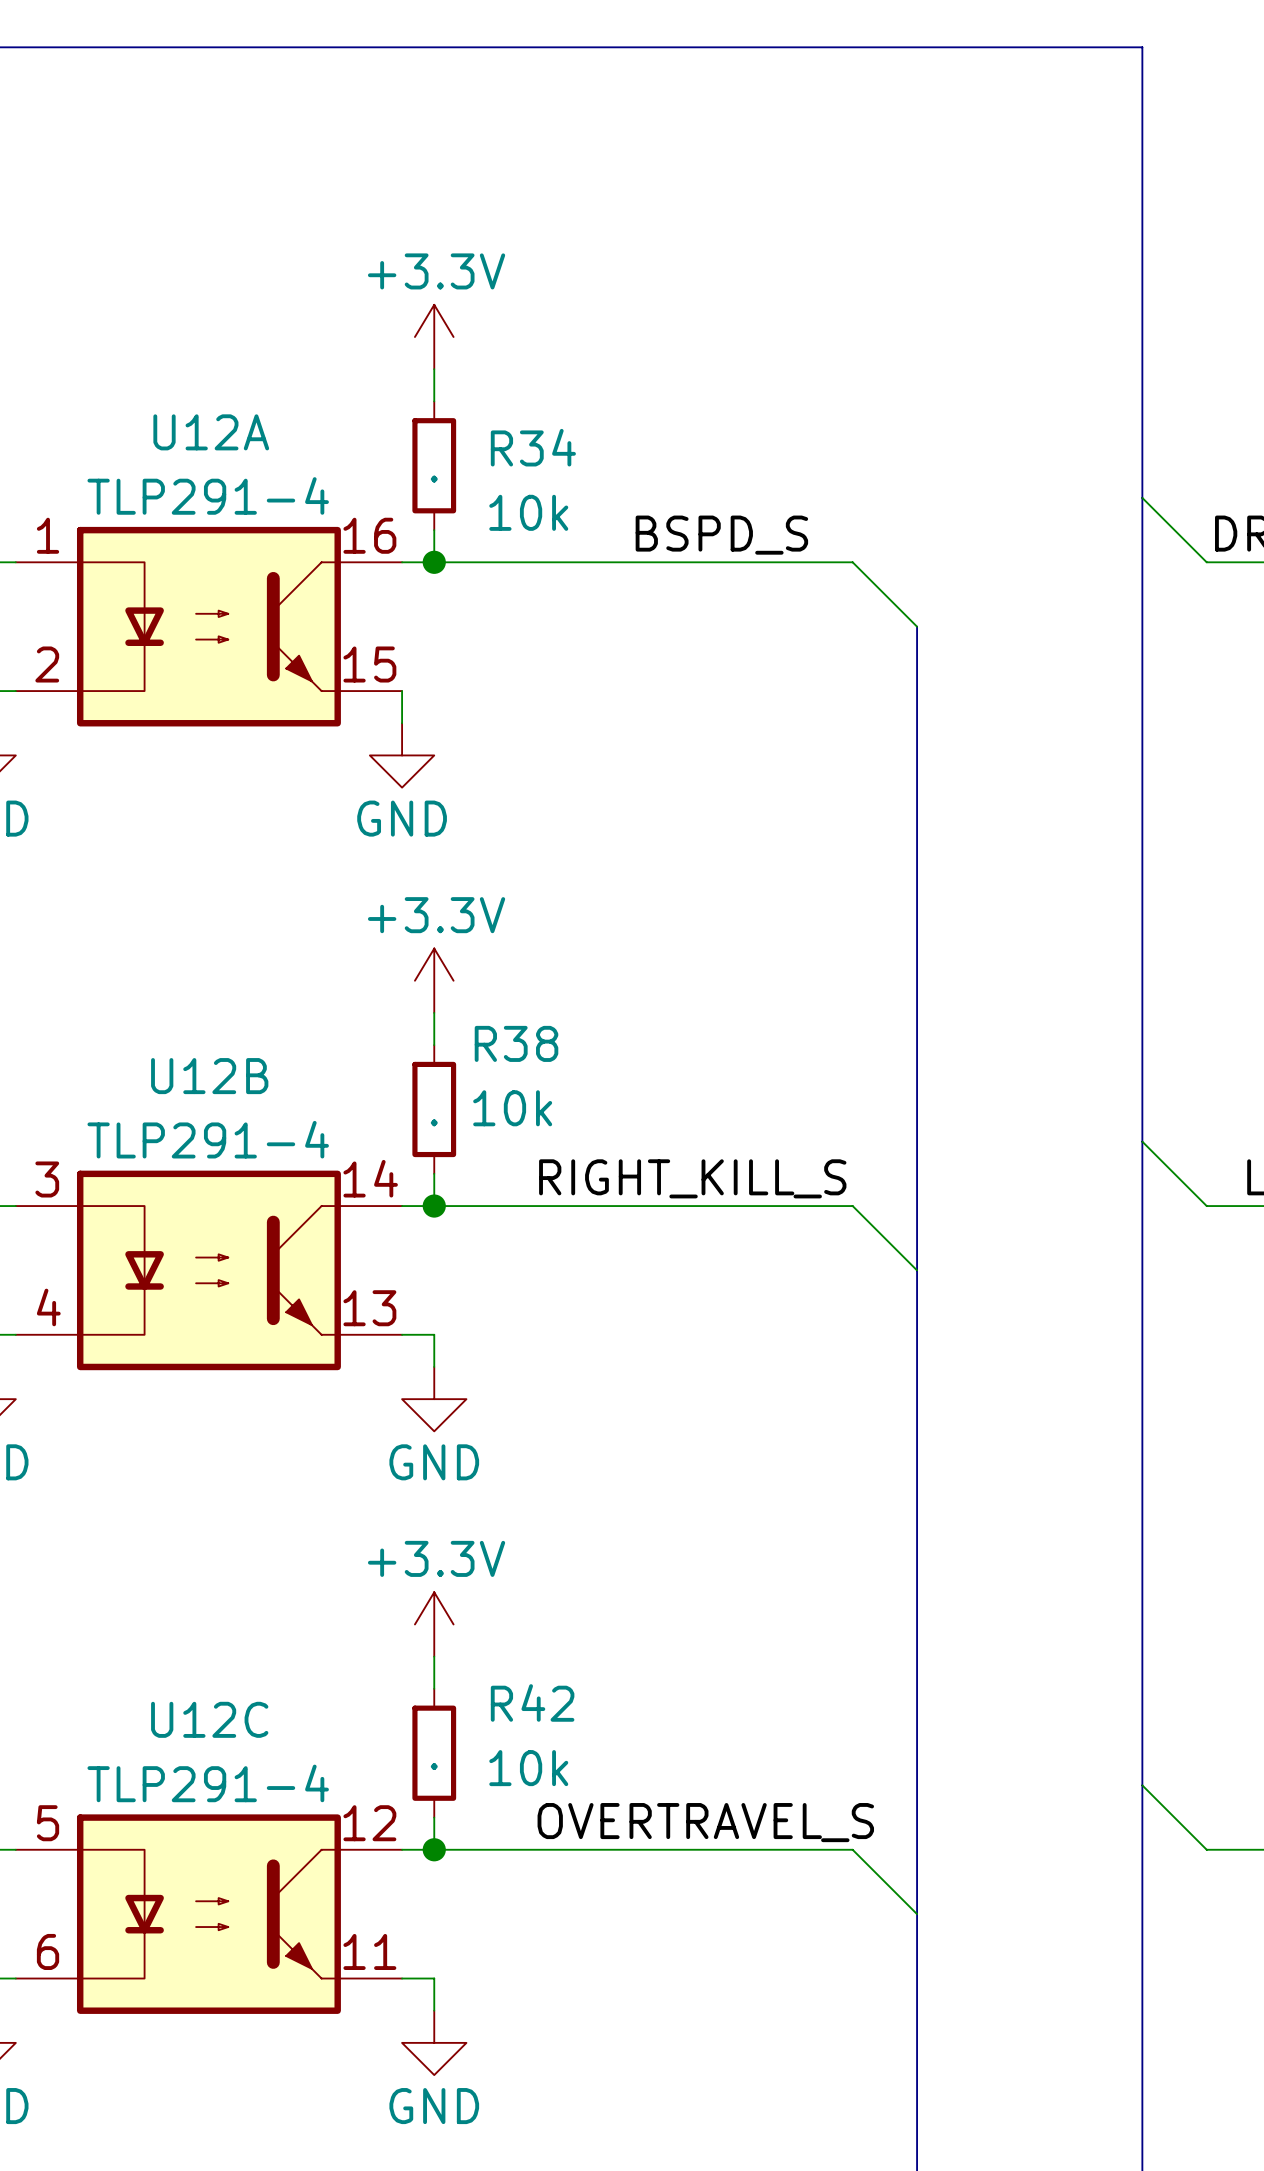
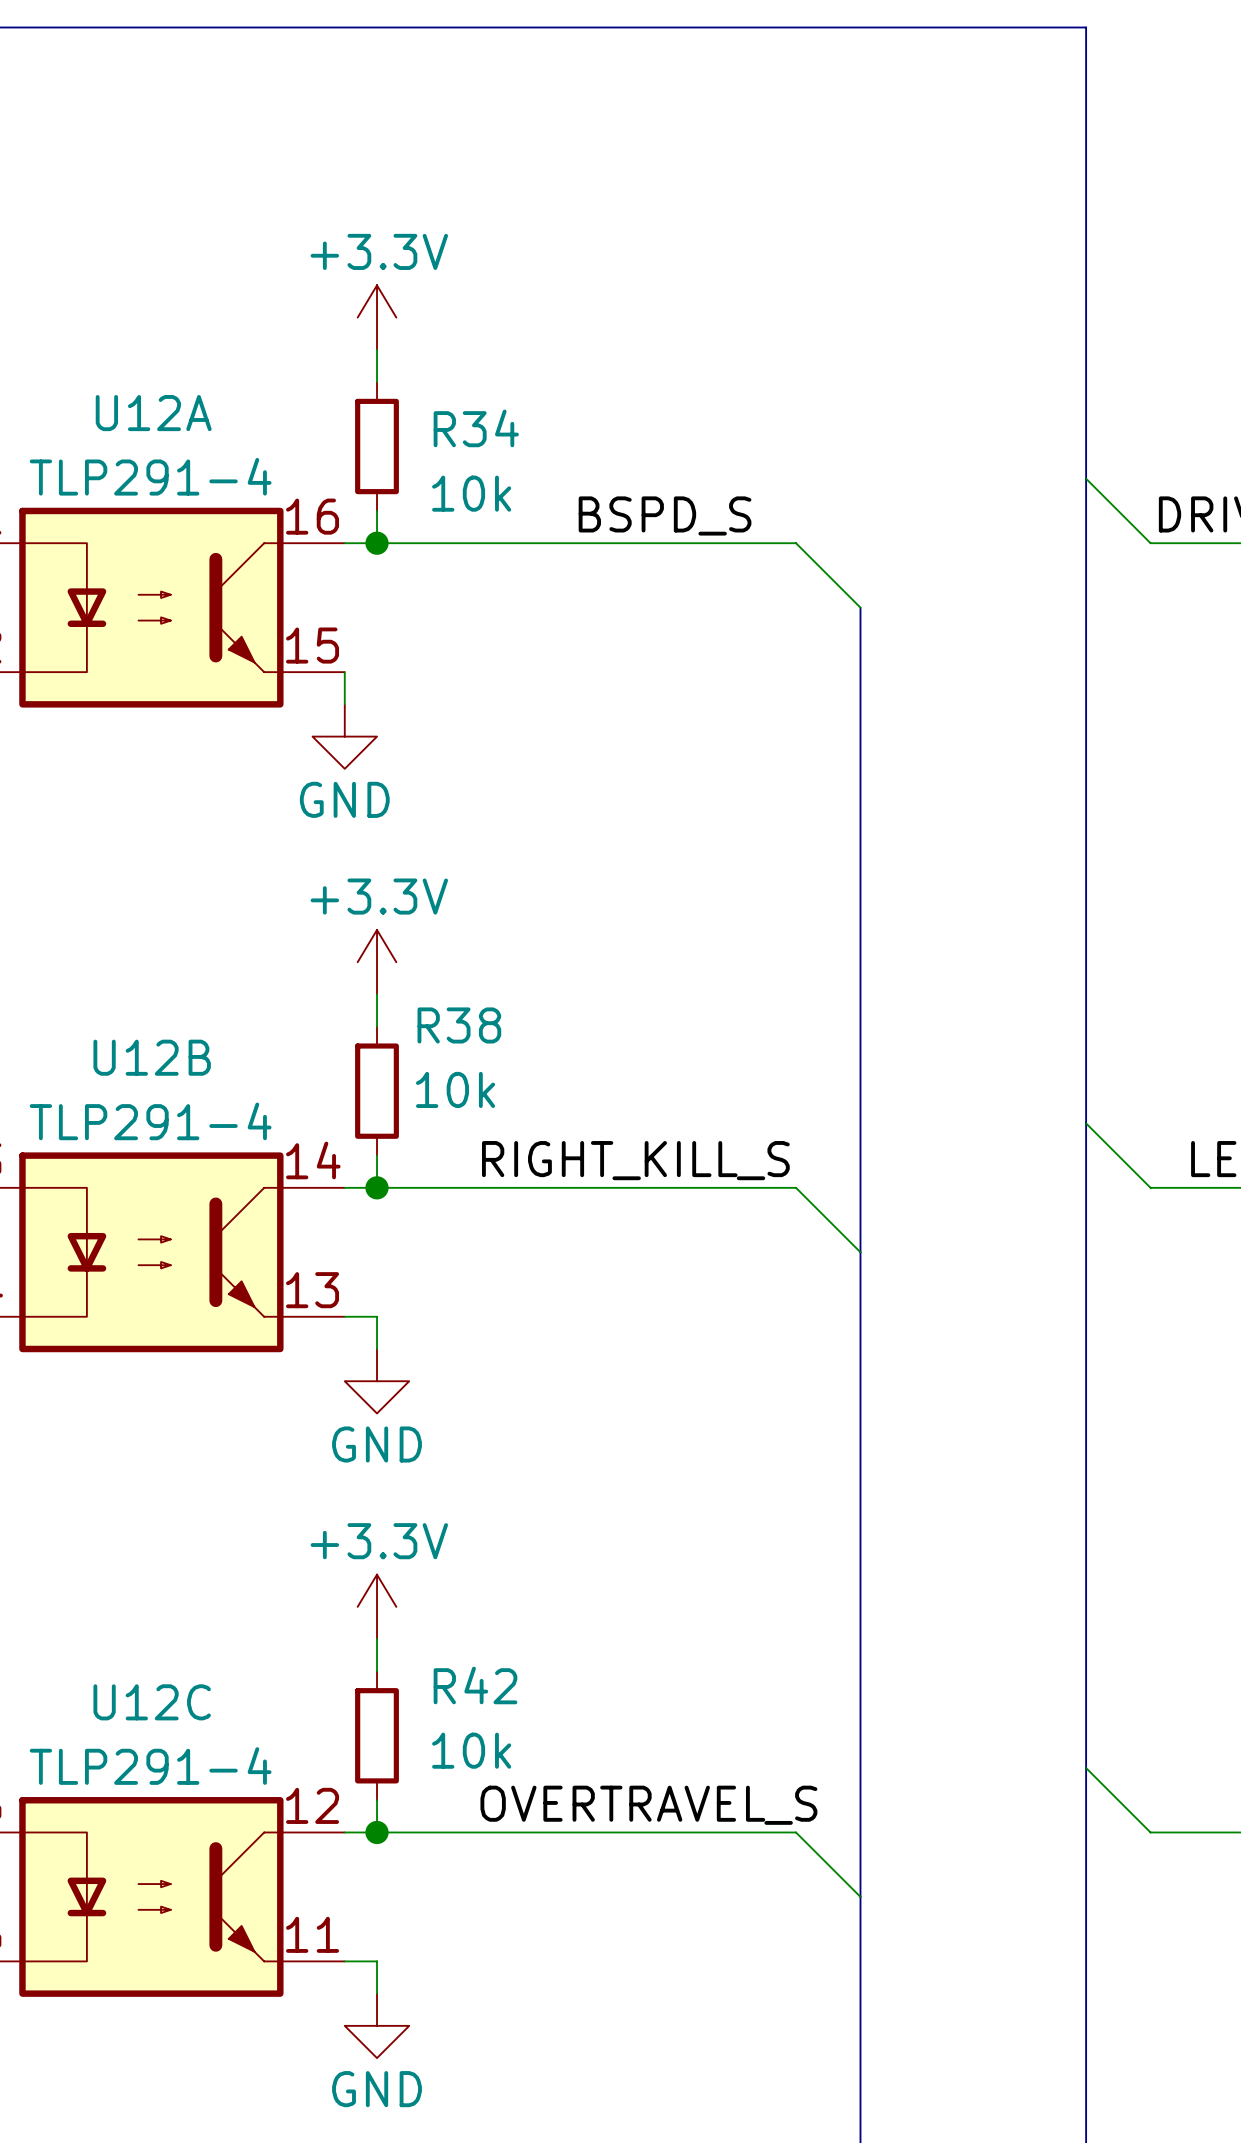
R34 text: . (434, 479) -> none
R38 text: . (434, 1122) -> none
R42 text: . (434, 1766) -> none

